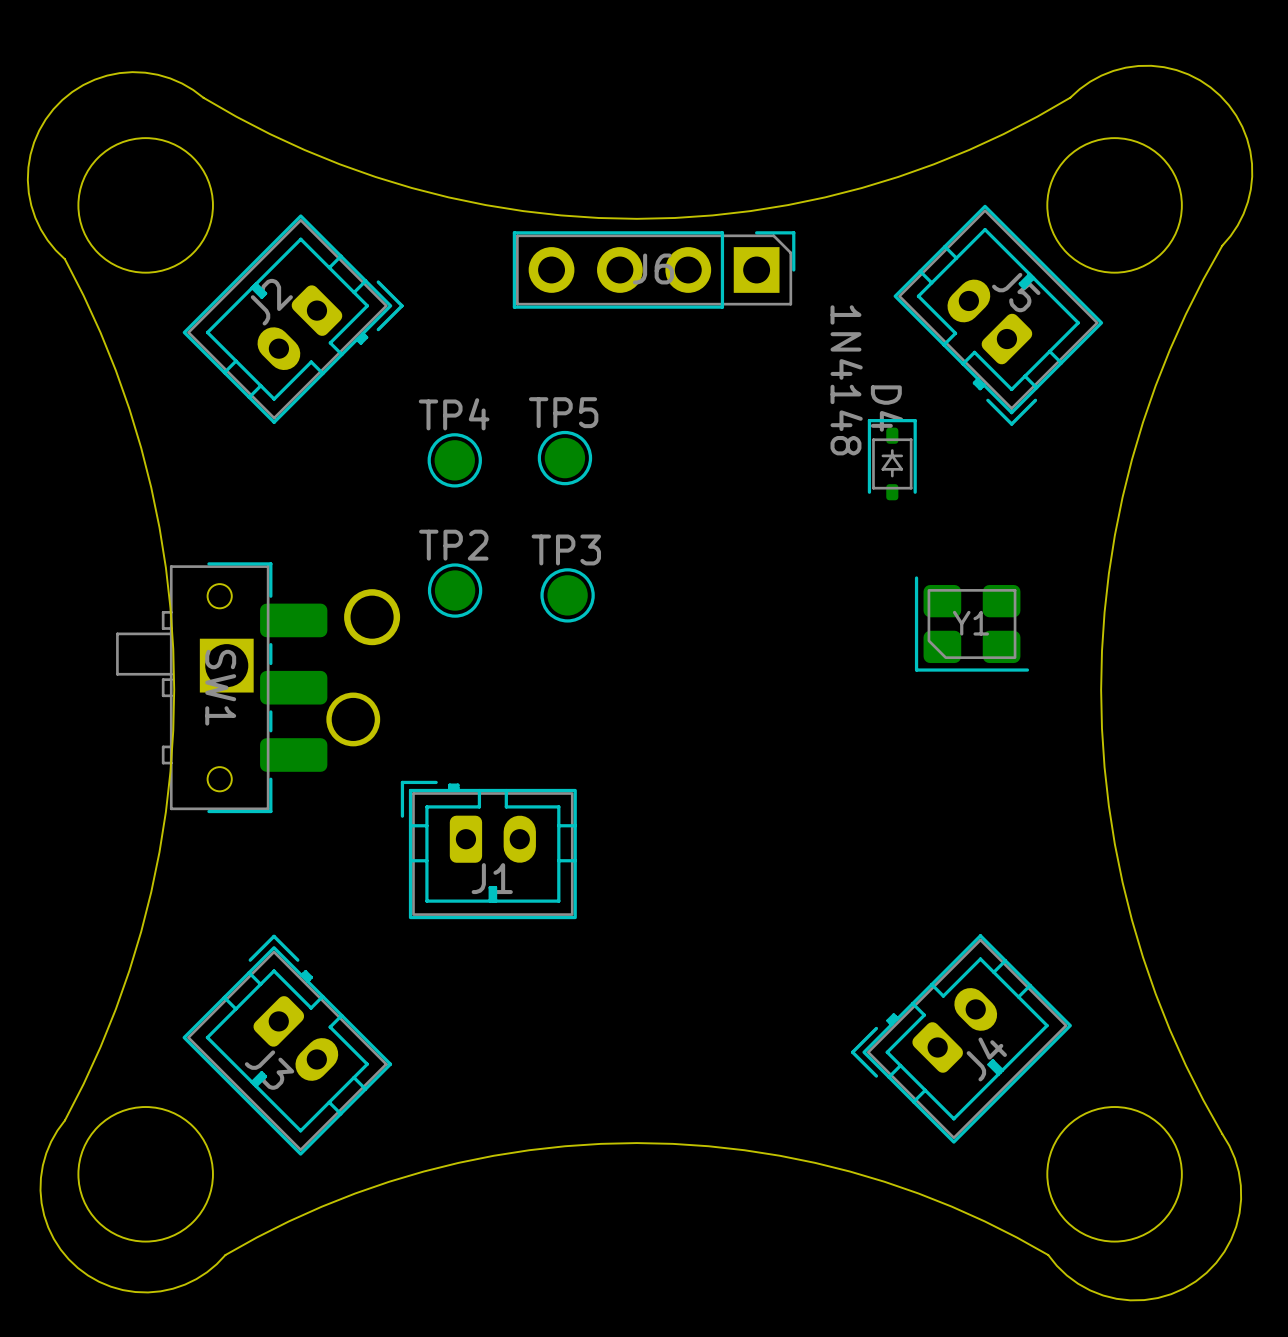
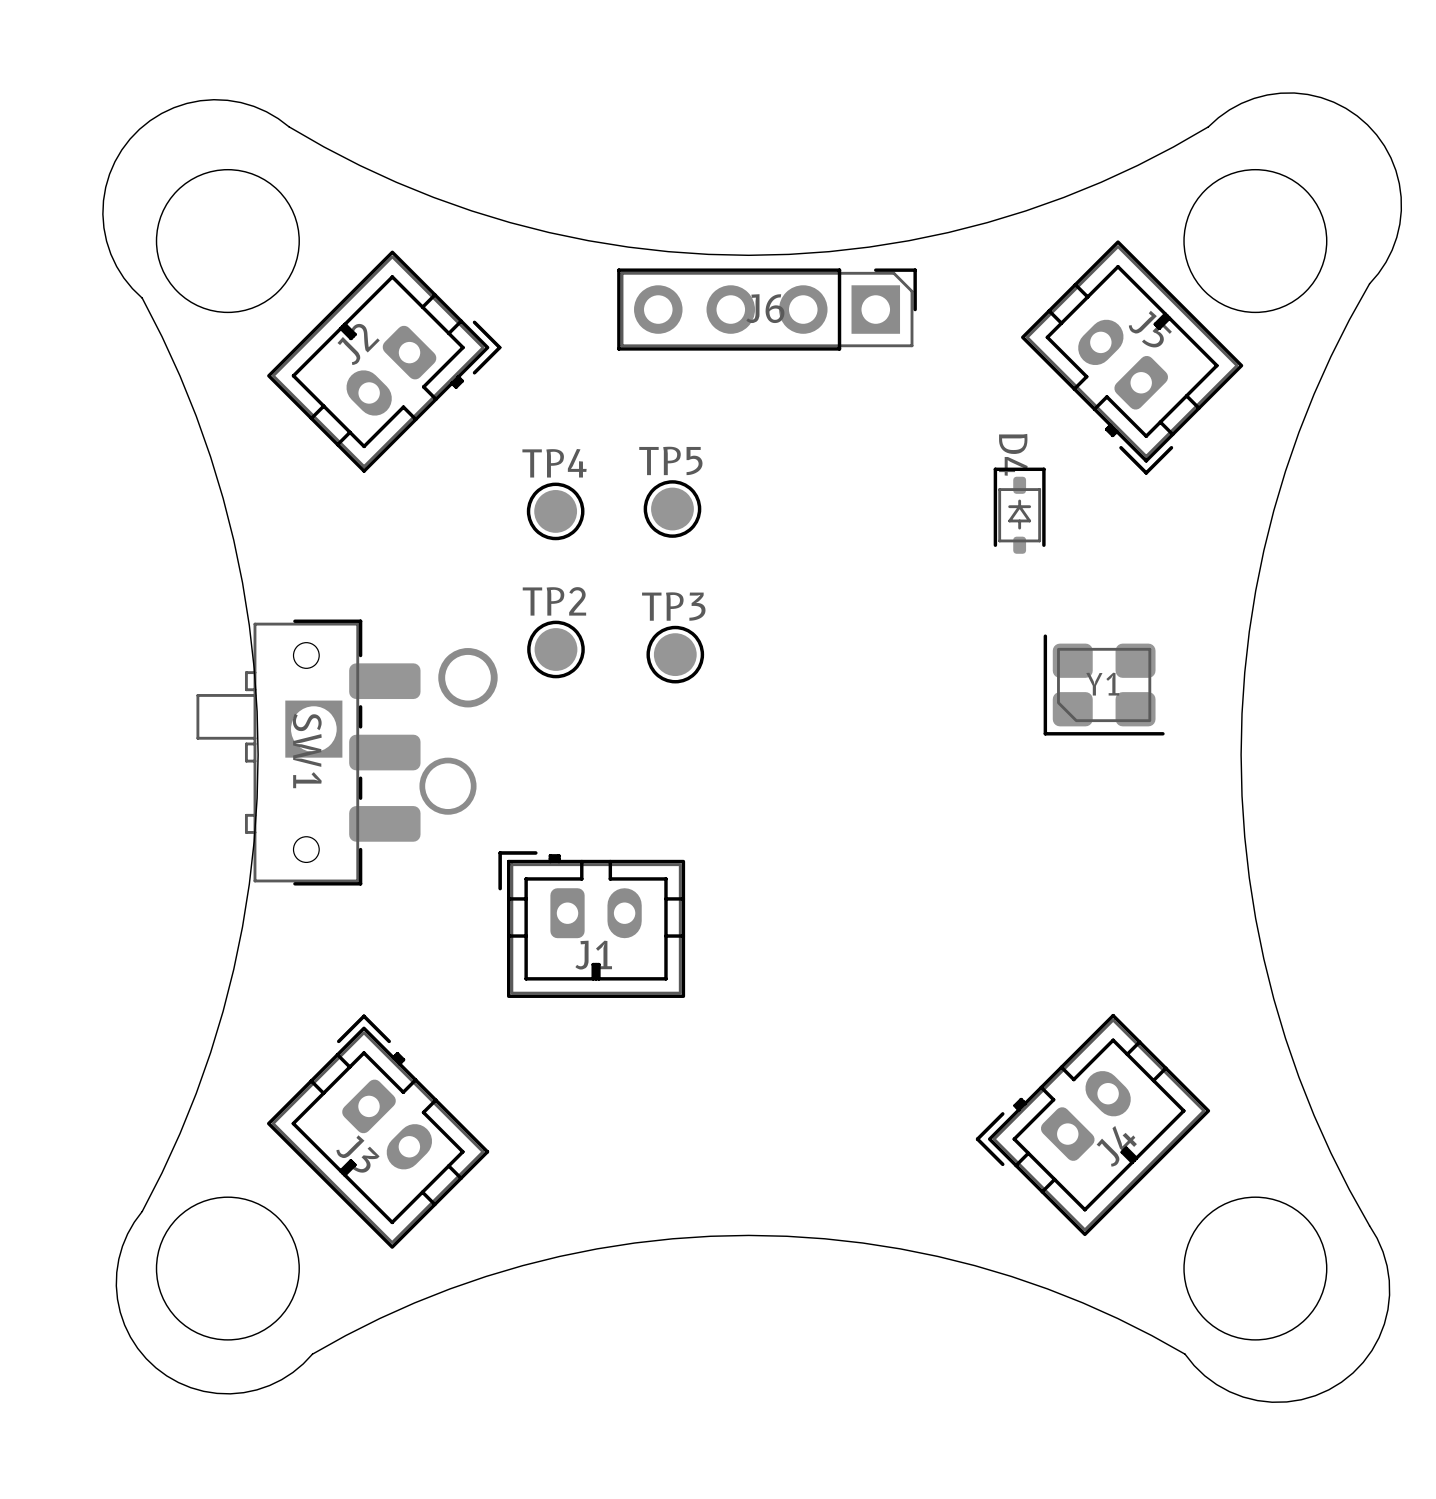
D4 value: 1N4148 (846, 380) -> none

